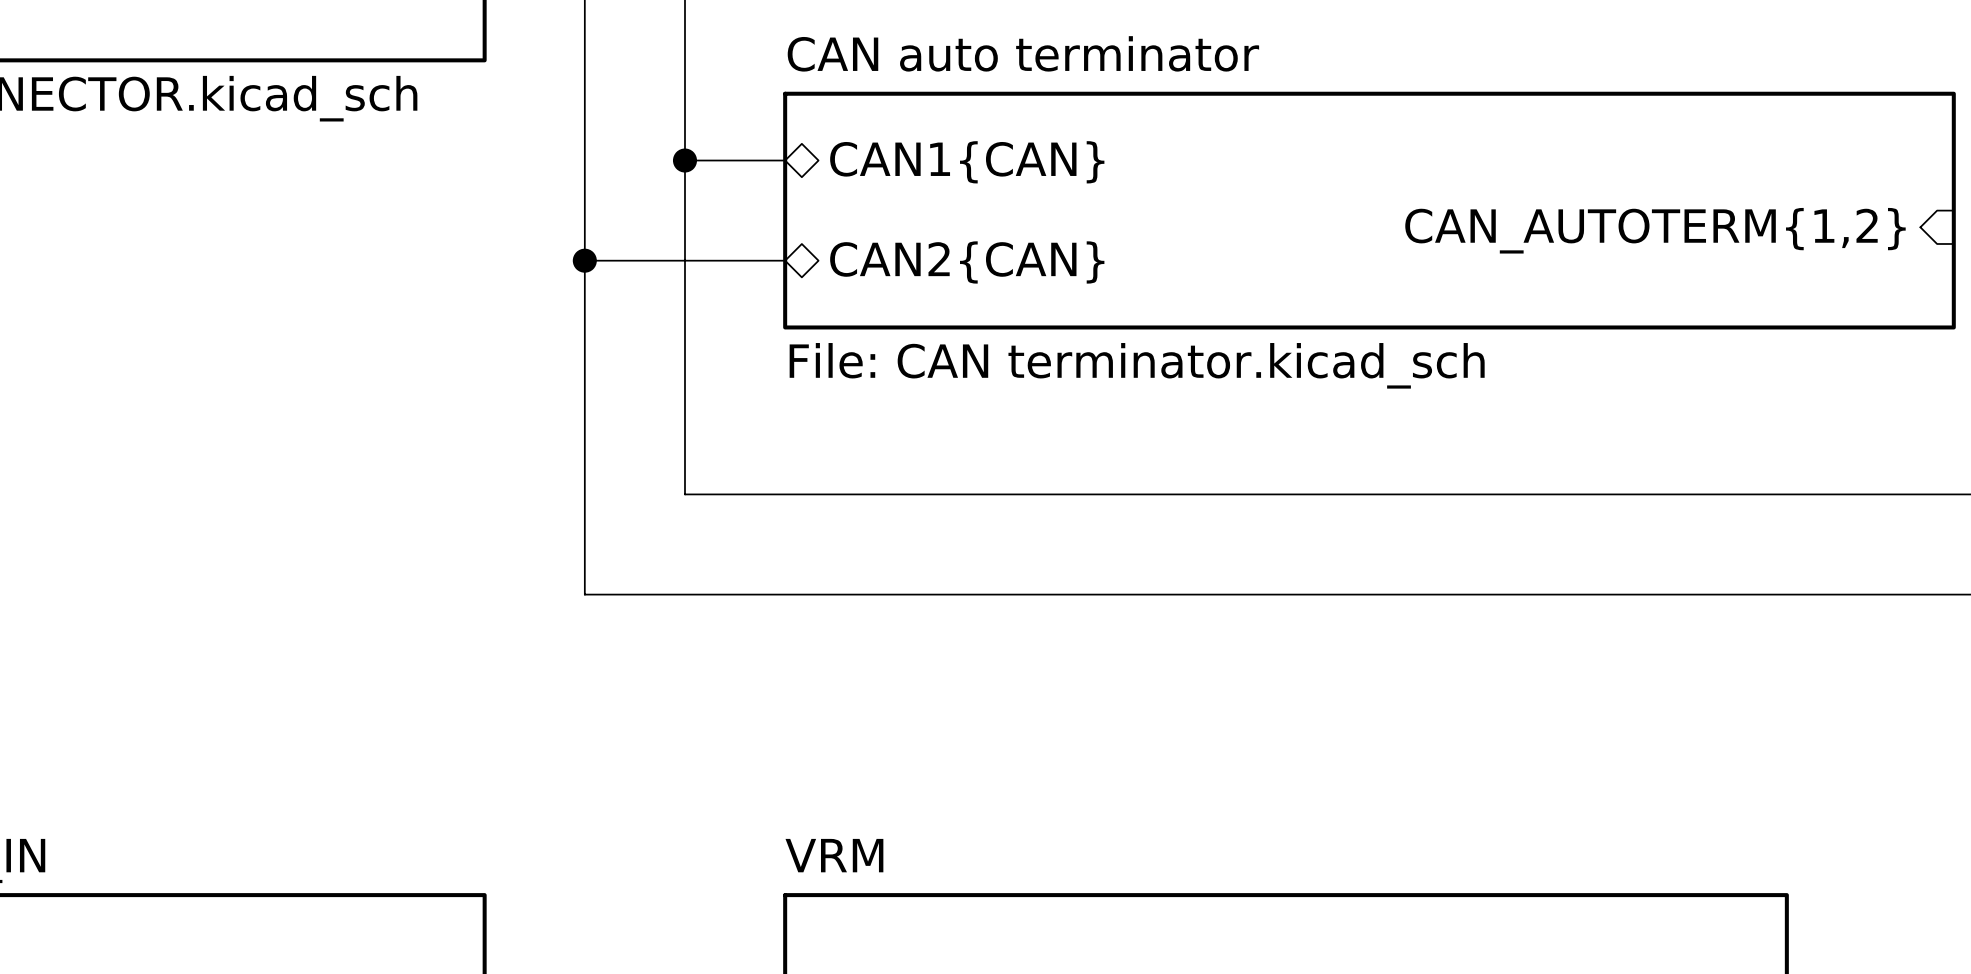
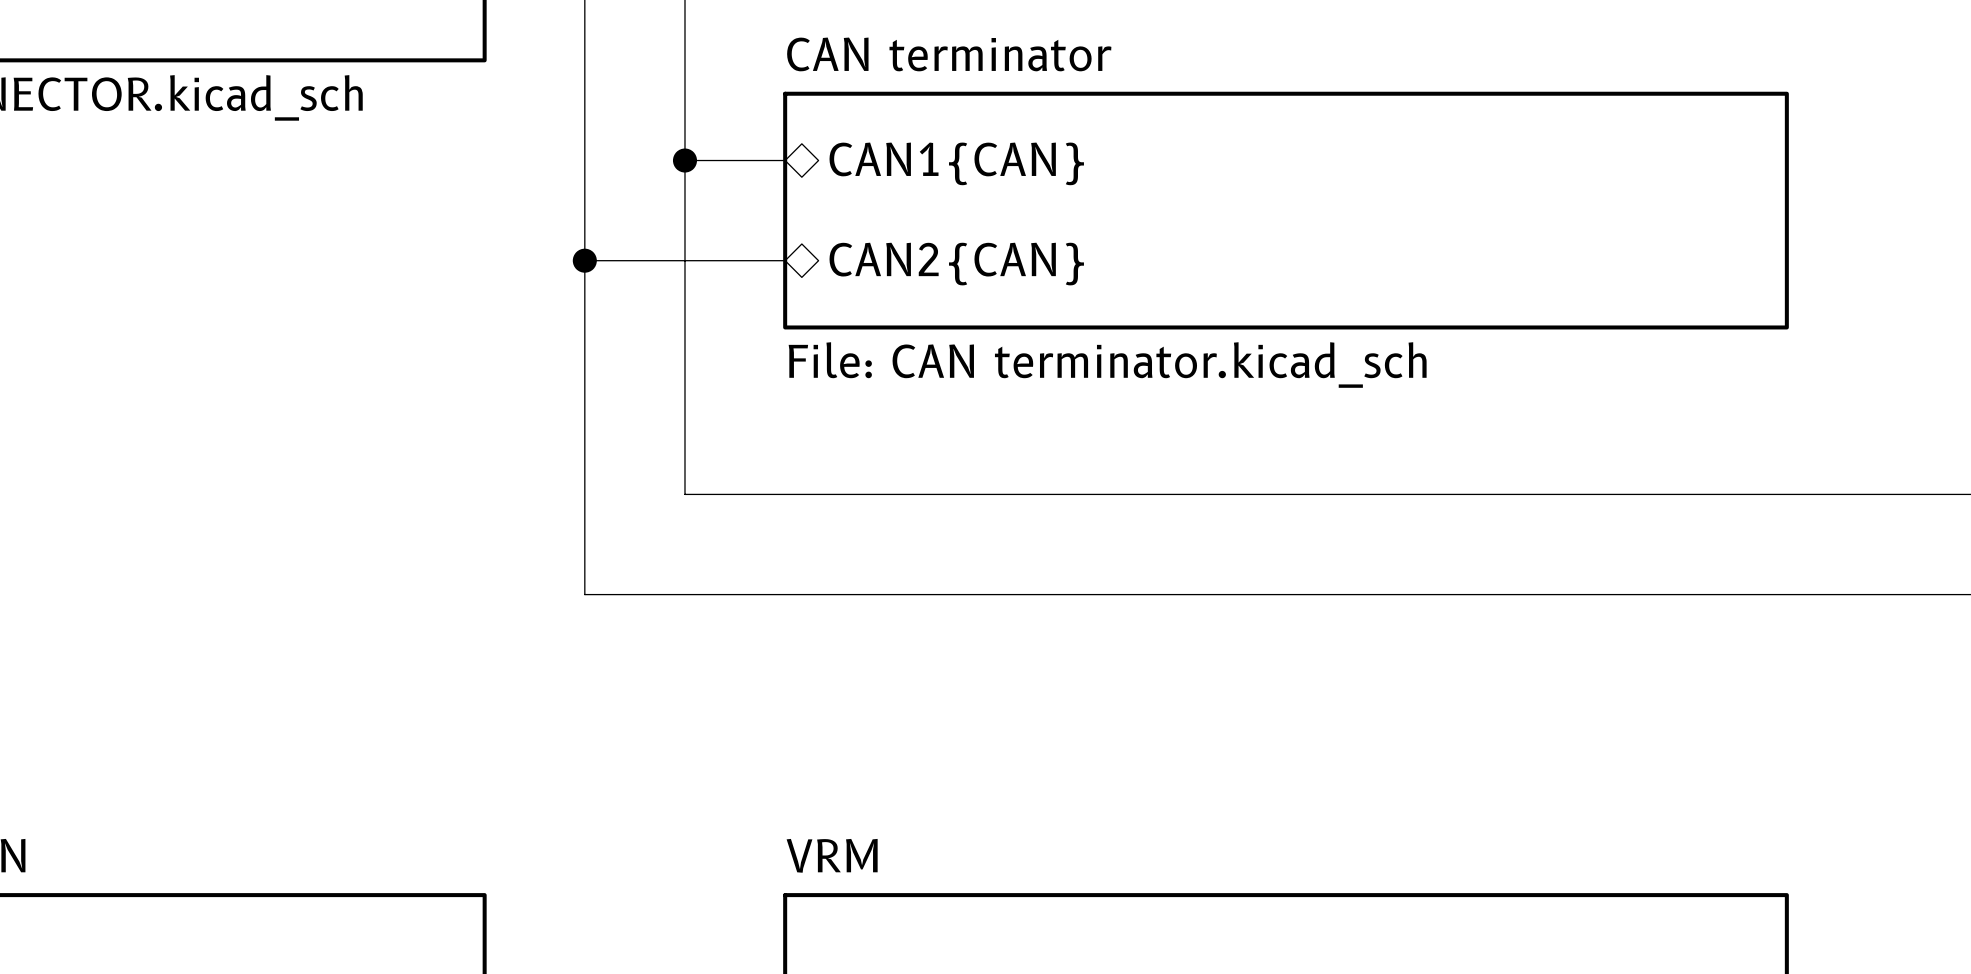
sheet CAN terminator: none -> File: CAN terminator.kicad_sch (1286, 210)
sheet CAN auto terminator: File: CAN terminator.kicad_sch (1369, 210) -> none
sheet pin: CAN_AUTOTERM{1,2} (1655, 230) -> none

